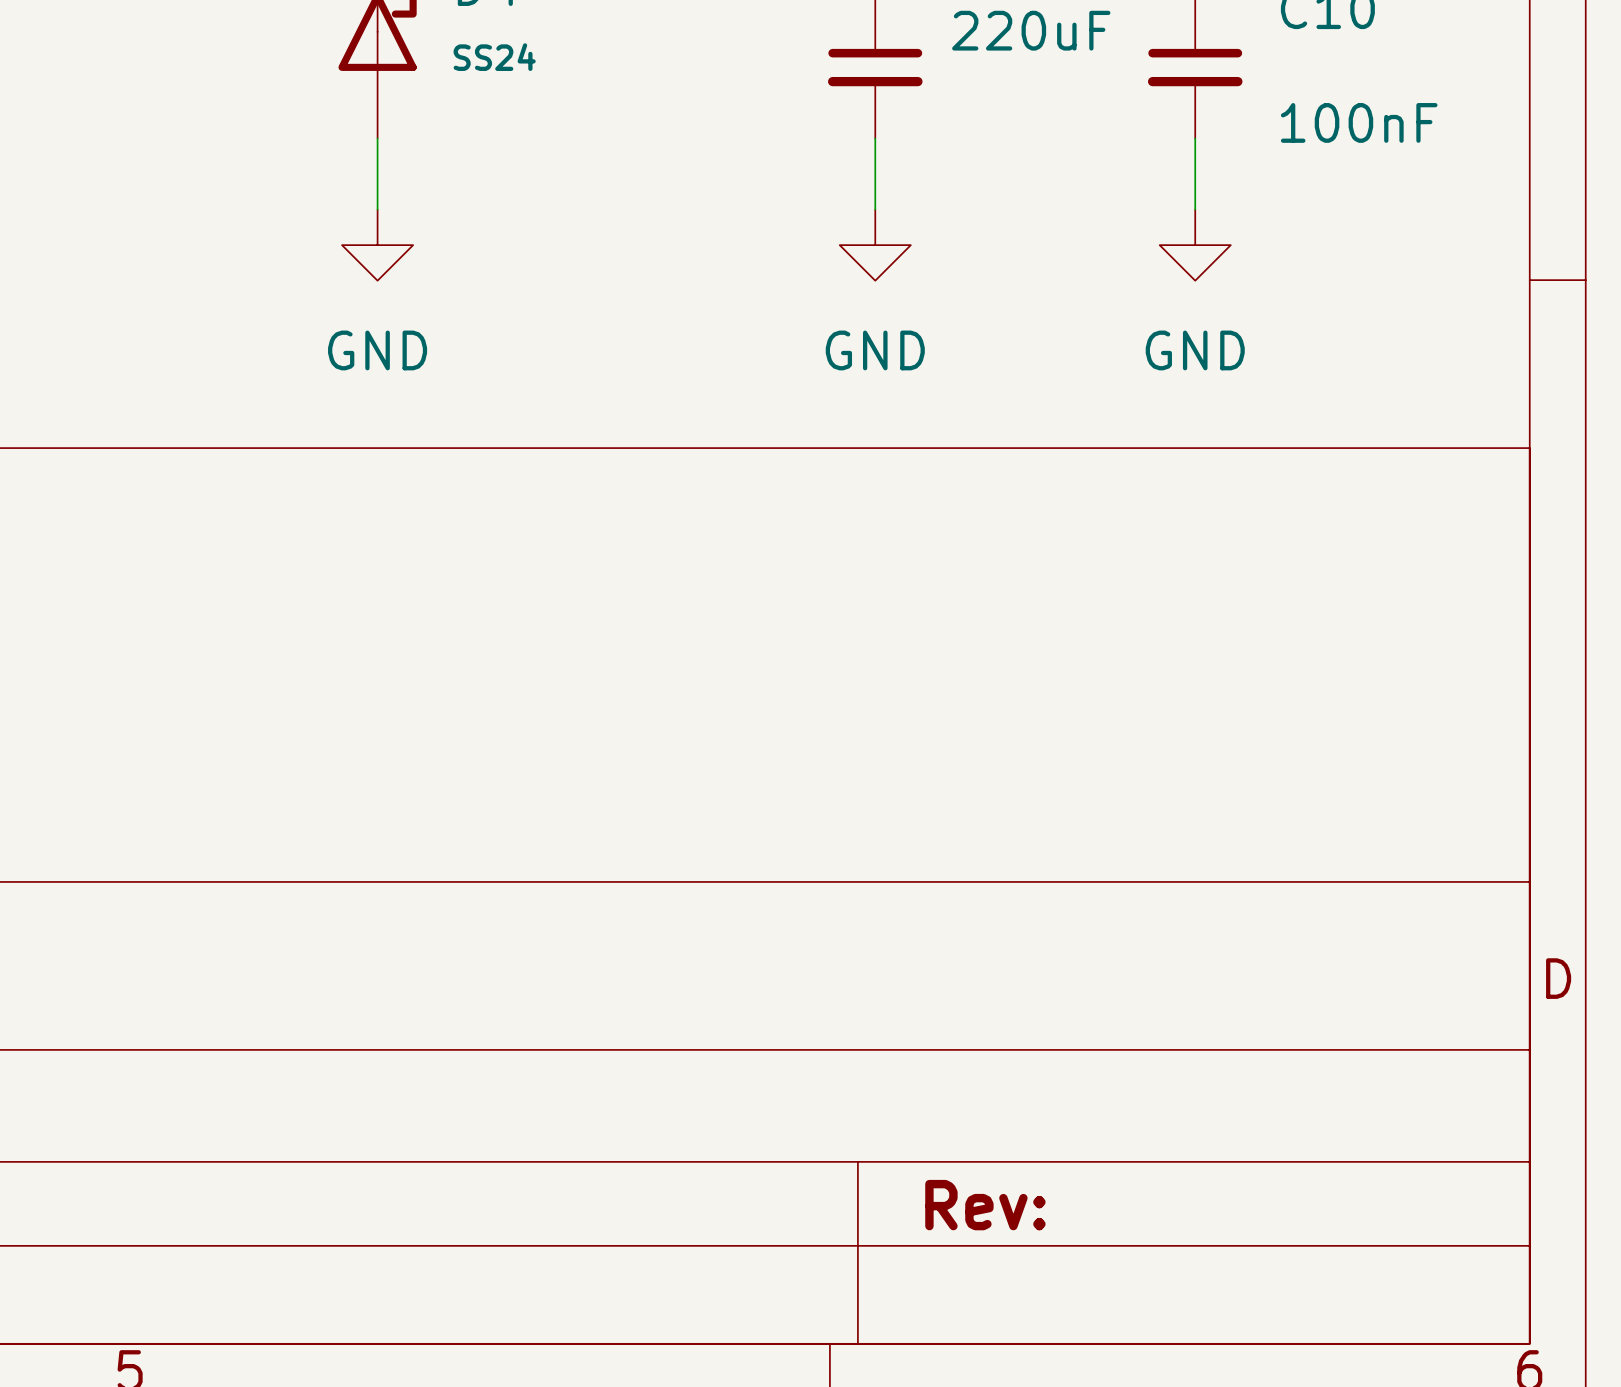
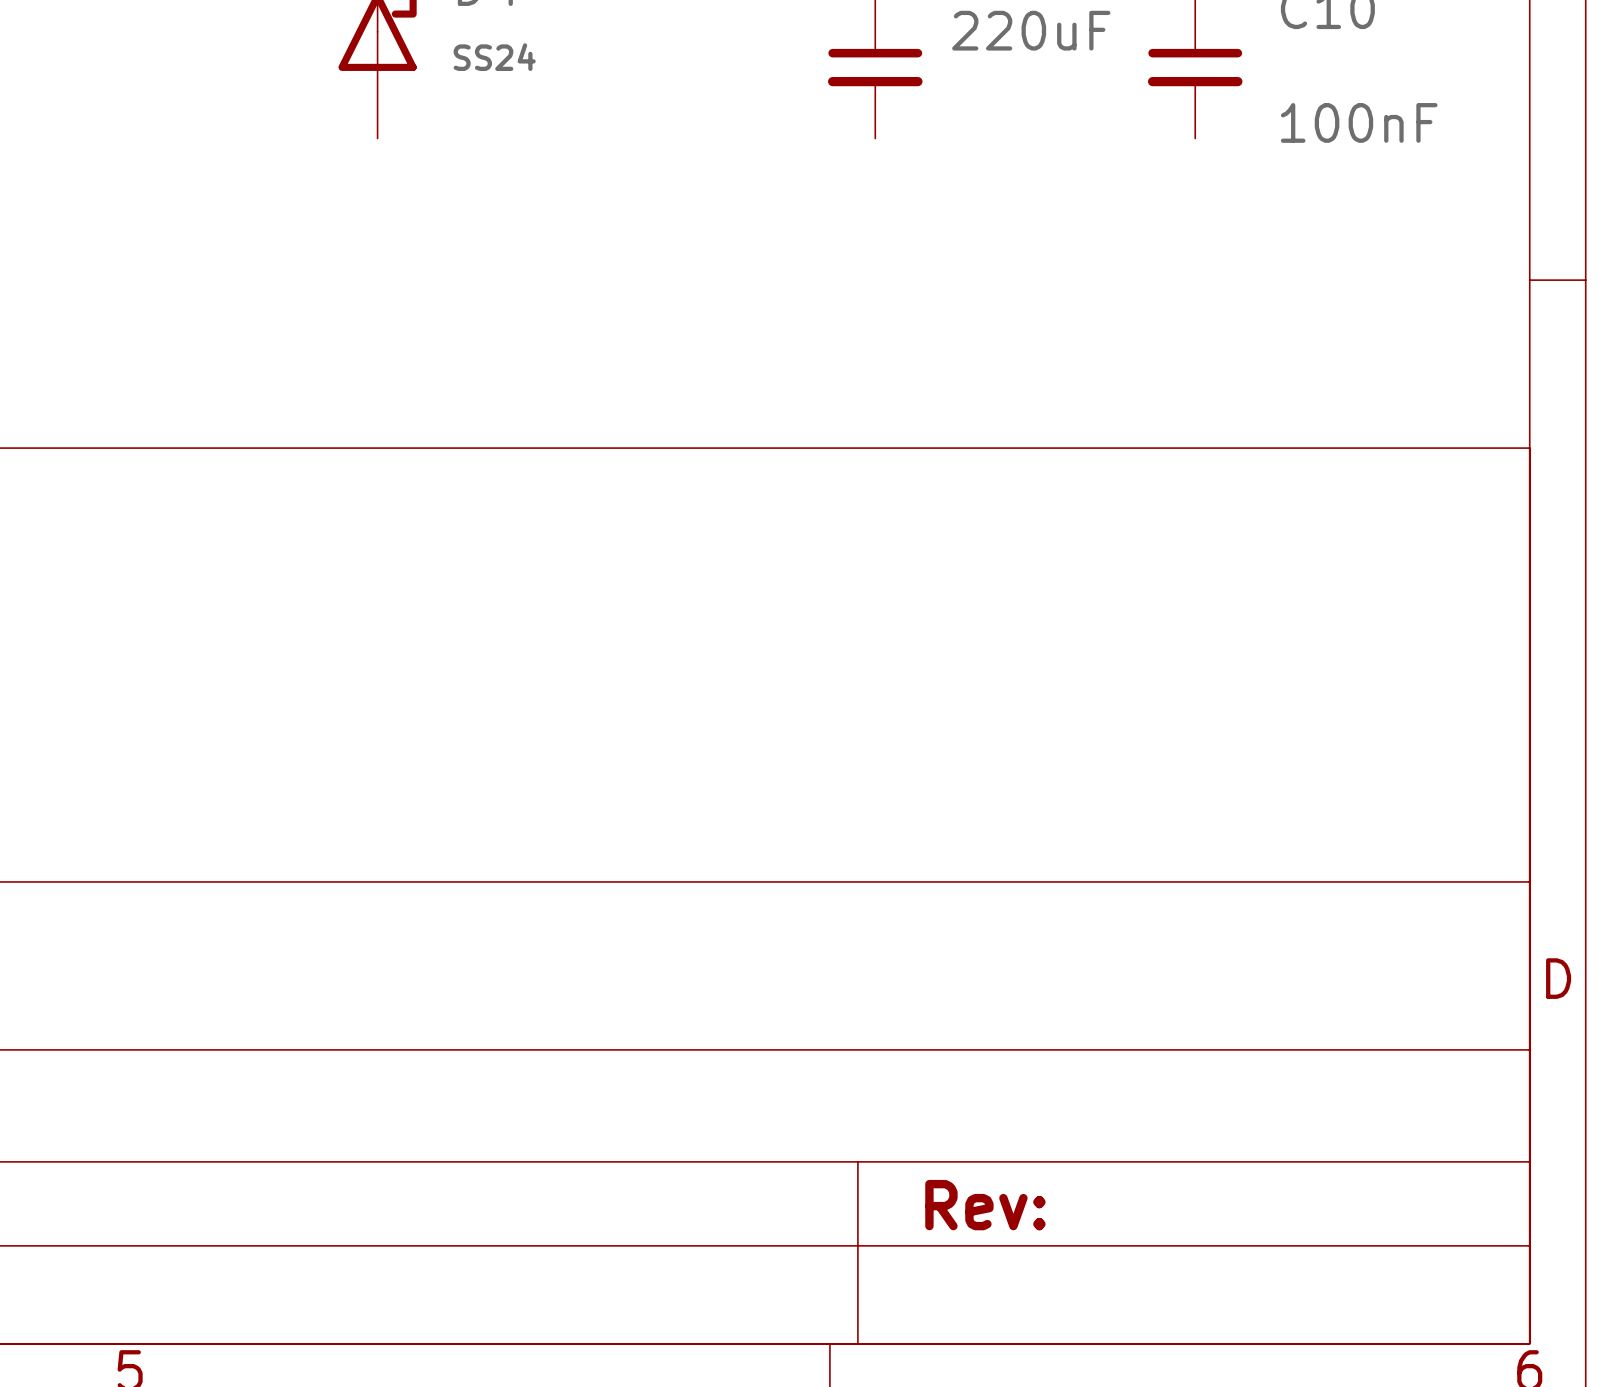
wire: (377, 138) (377, 209) -> none
wire: (875, 138) (875, 209) -> none
wire: (1195, 138) (1195, 209) -> none
power symbol: GND (377, 245) -> none
power symbol: GND (875, 245) -> none
power symbol: GND (1195, 245) -> none

